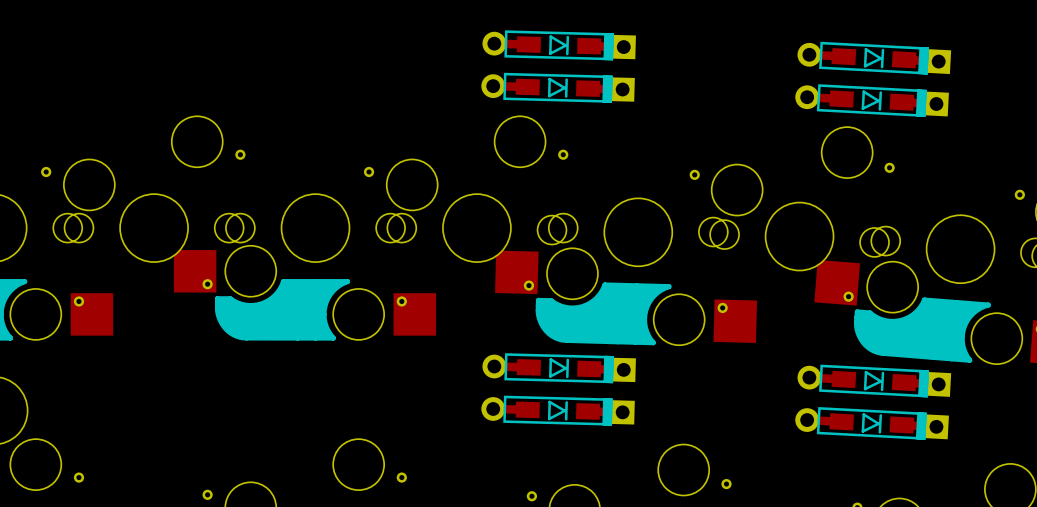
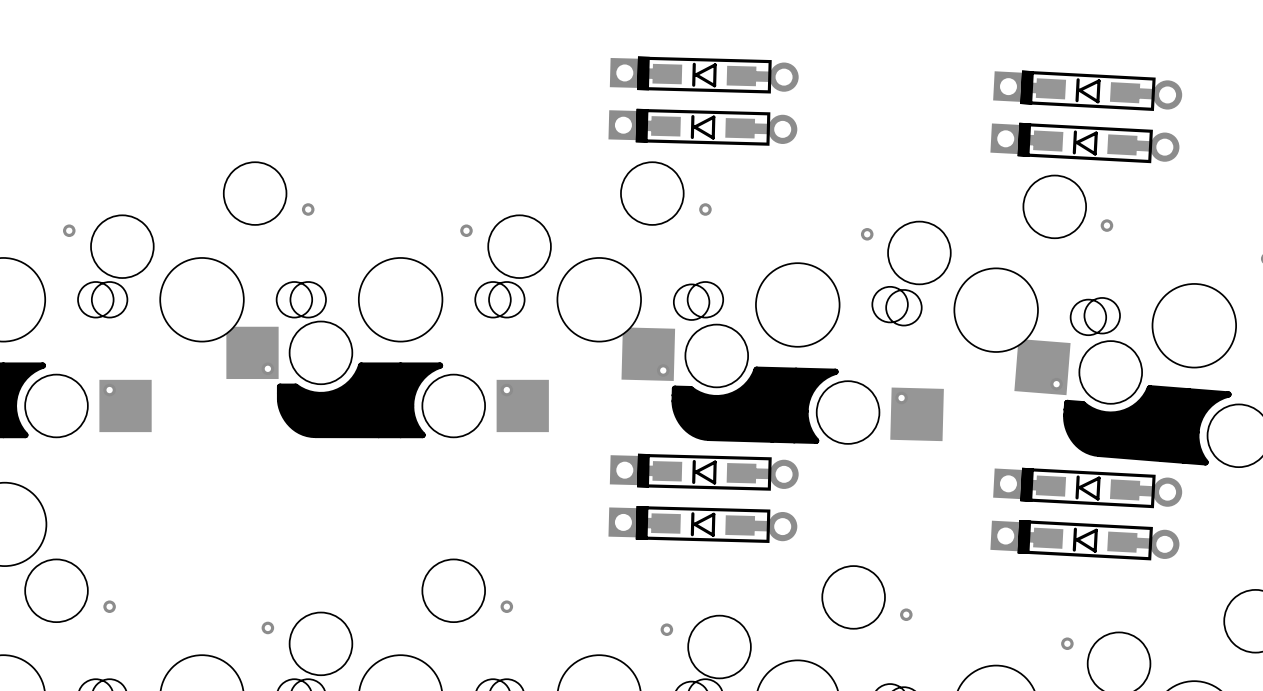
part rotation: 0° (559, 45) -> 180° (704, 75)
part rotation: 0° (874, 58) -> 180° (1087, 90)
part rotation: 0° (558, 87) -> 180° (702, 127)
part rotation: 0° (872, 100) -> 180° (1084, 142)
part rotation: 0° (559, 368) -> 180° (704, 472)
part rotation: 0° (874, 381) -> 180° (1087, 488)
part rotation: 0° (558, 410) -> 180° (702, 524)
part rotation: 0° (872, 423) -> 180° (1084, 540)

